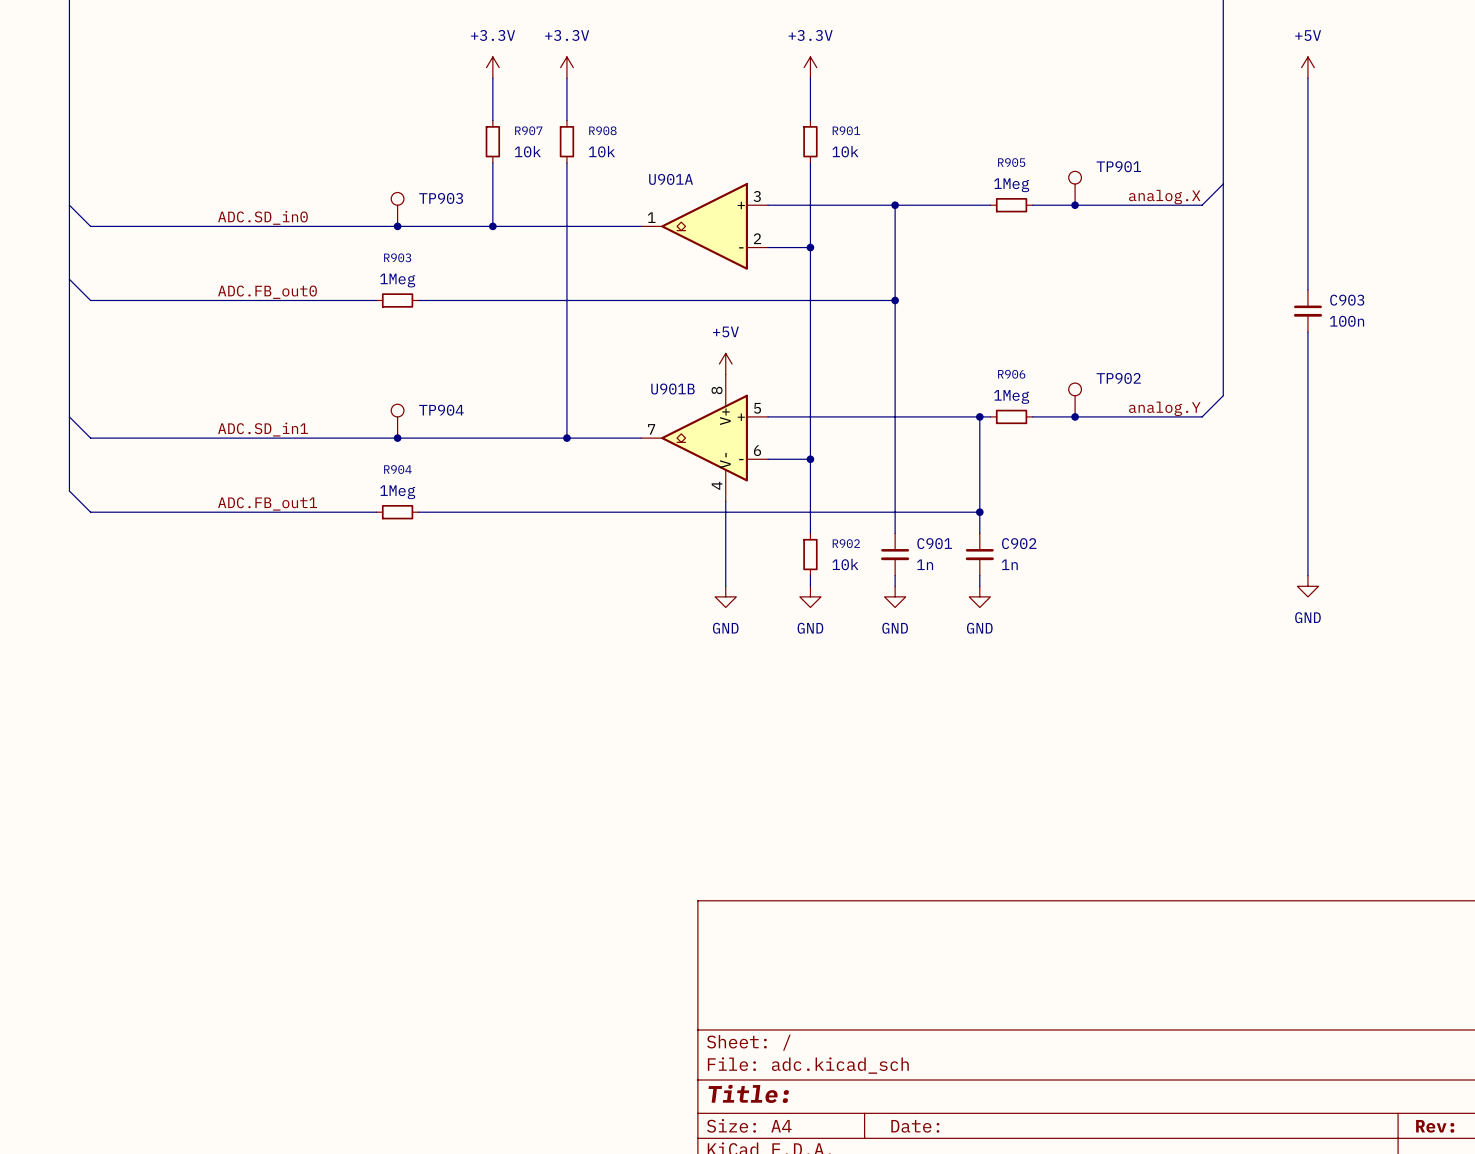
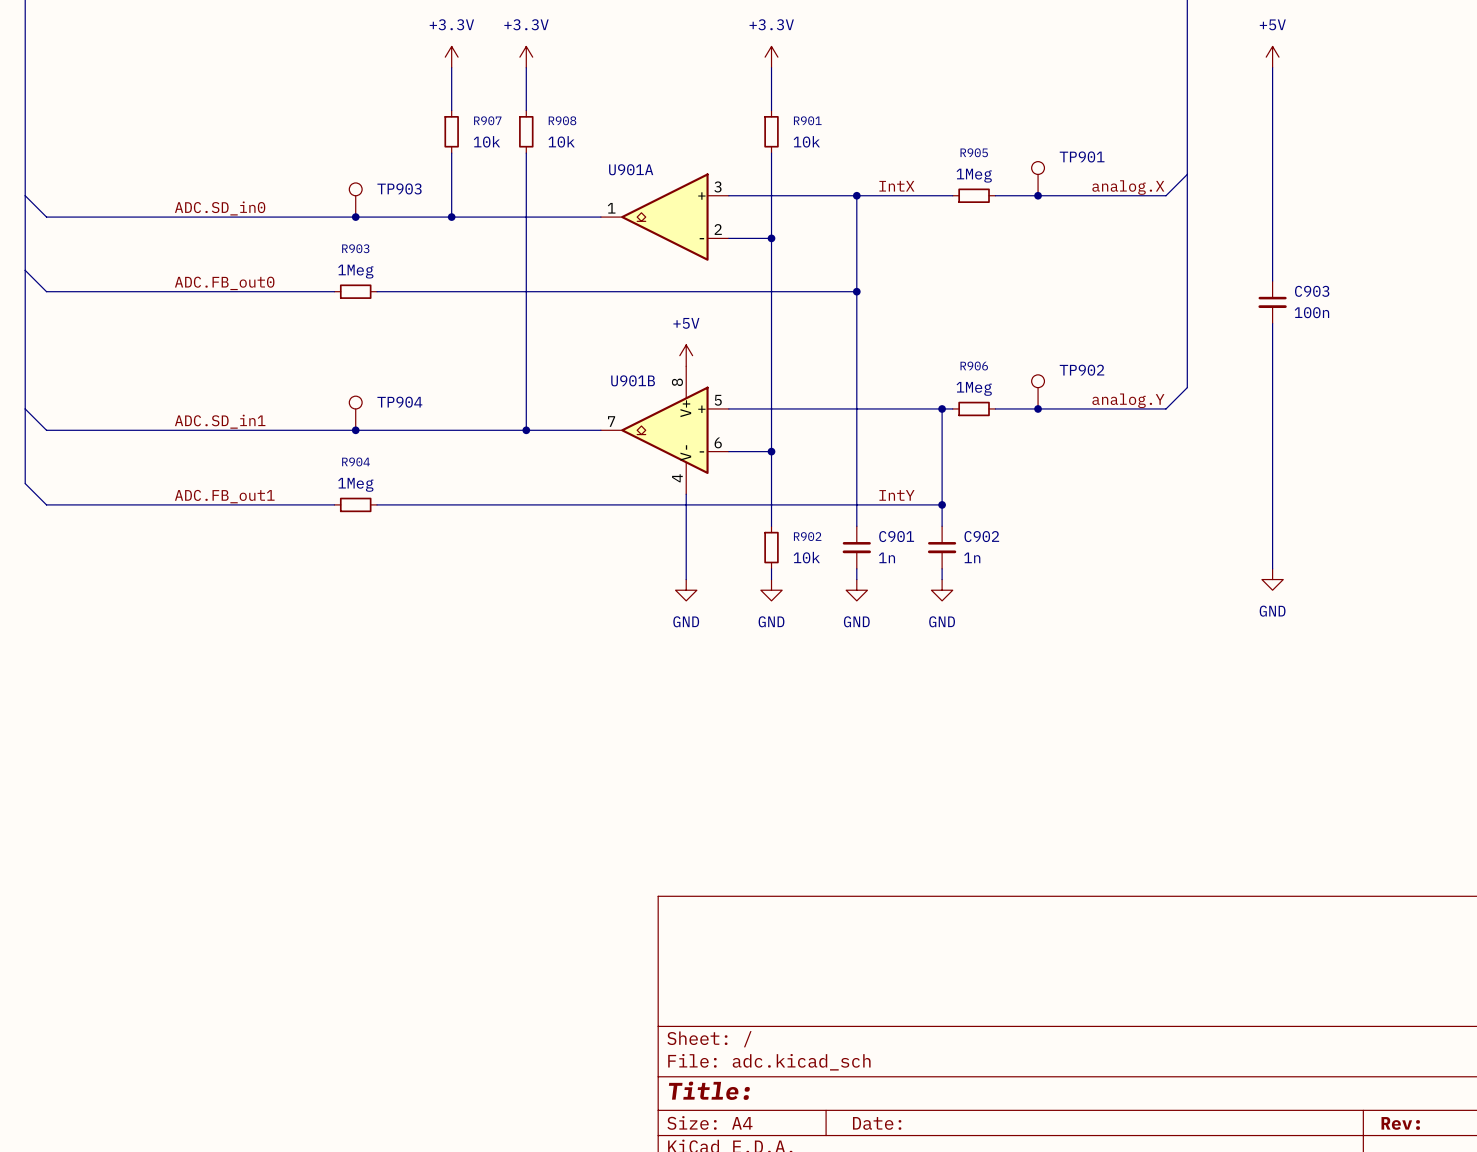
label: none -> IntX (896, 186)
label: none -> IntY (896, 495)

